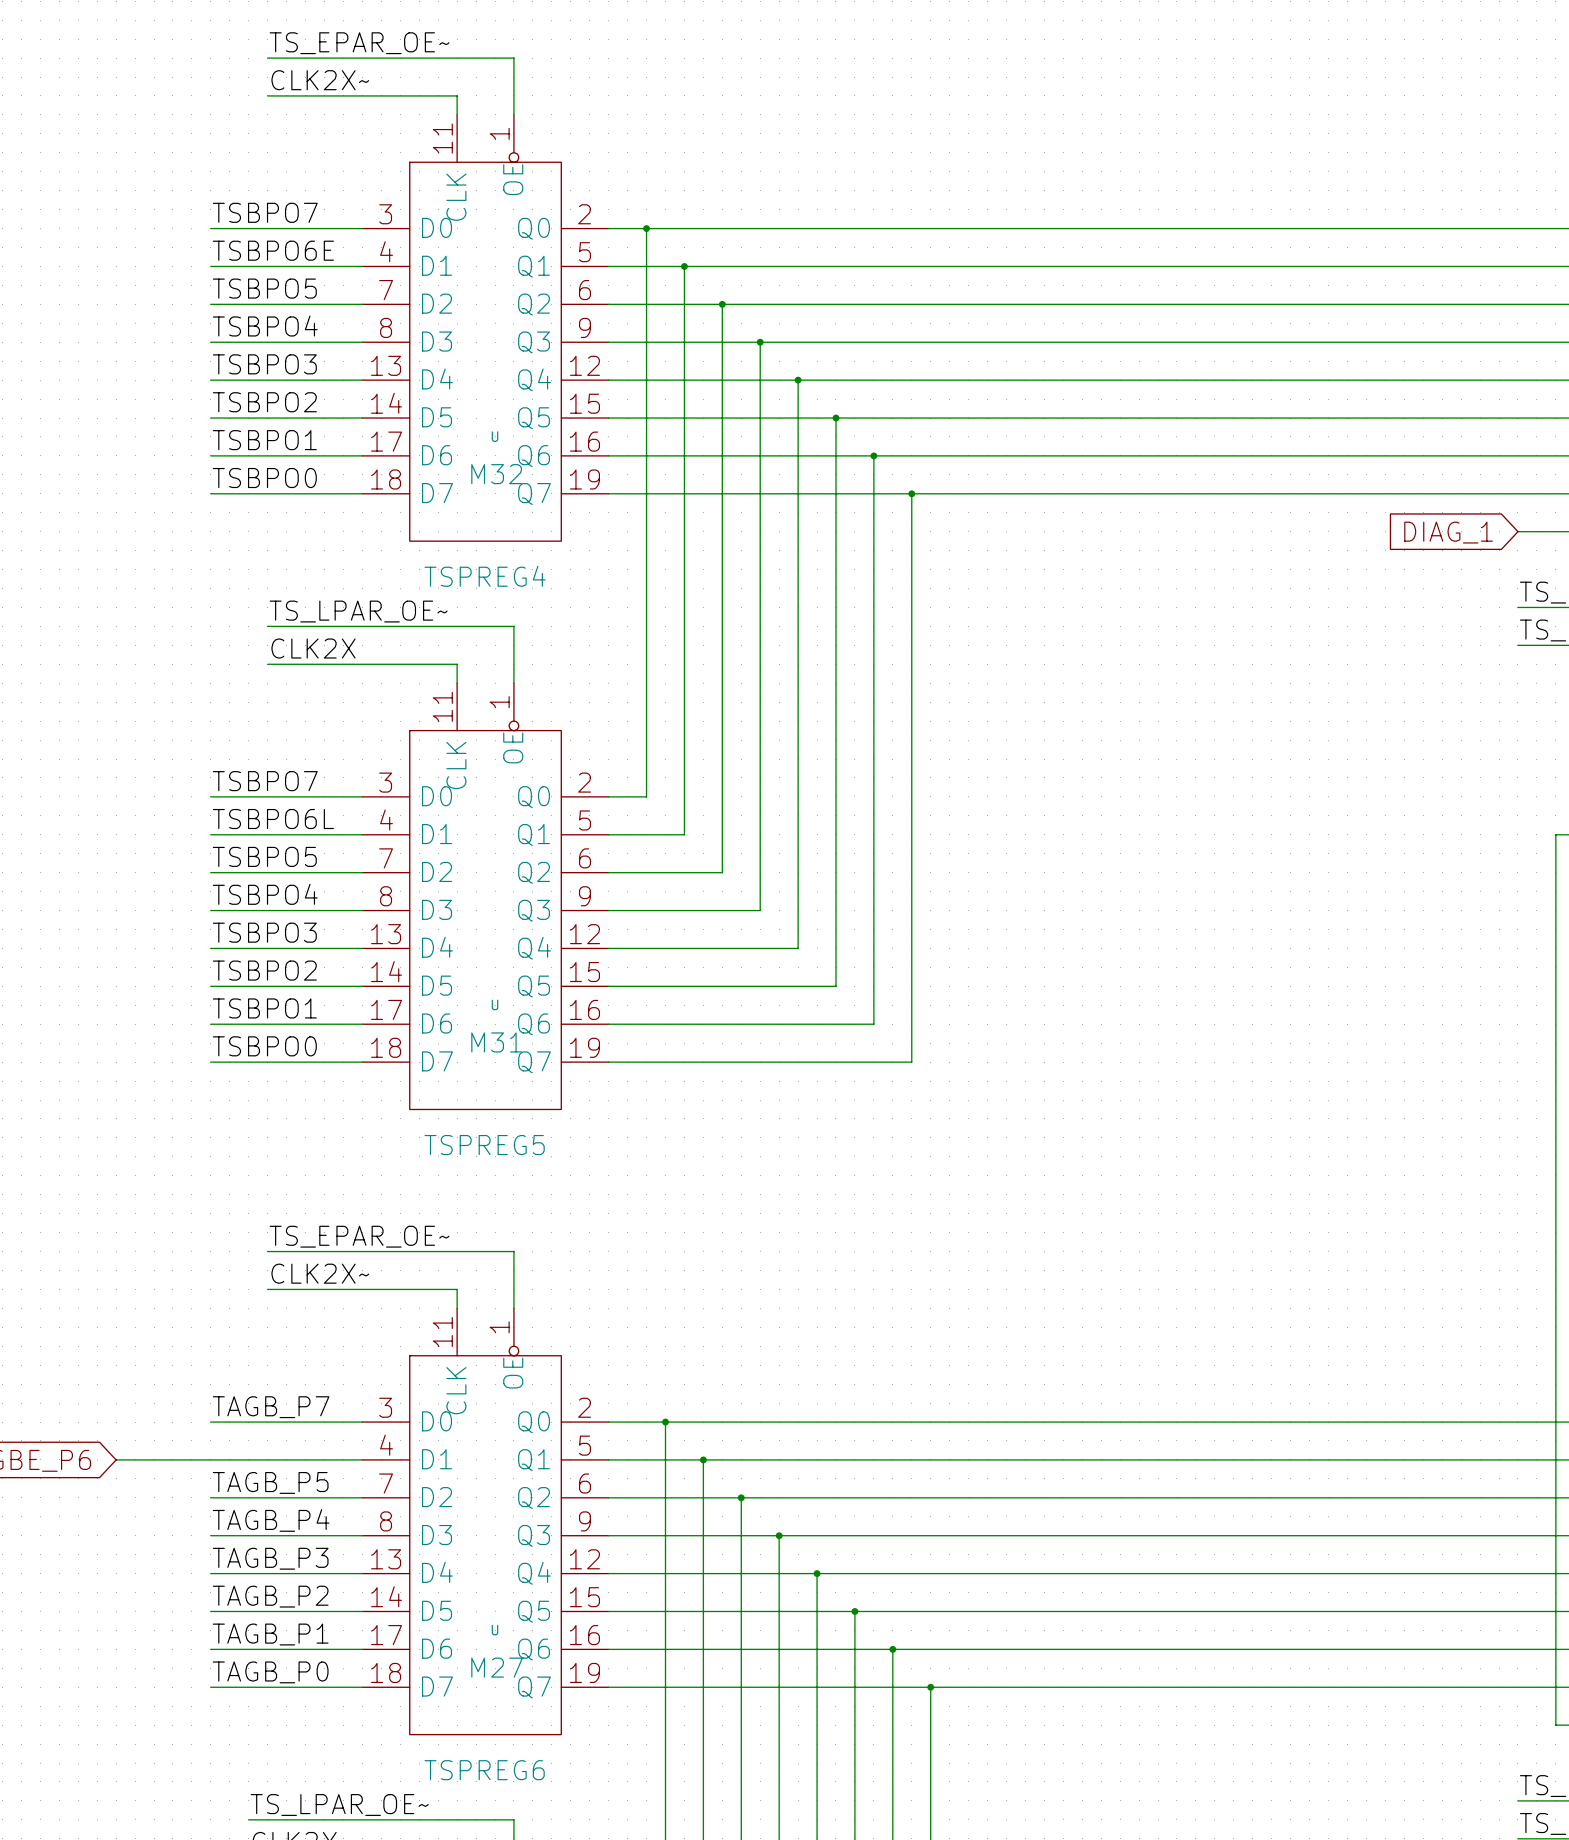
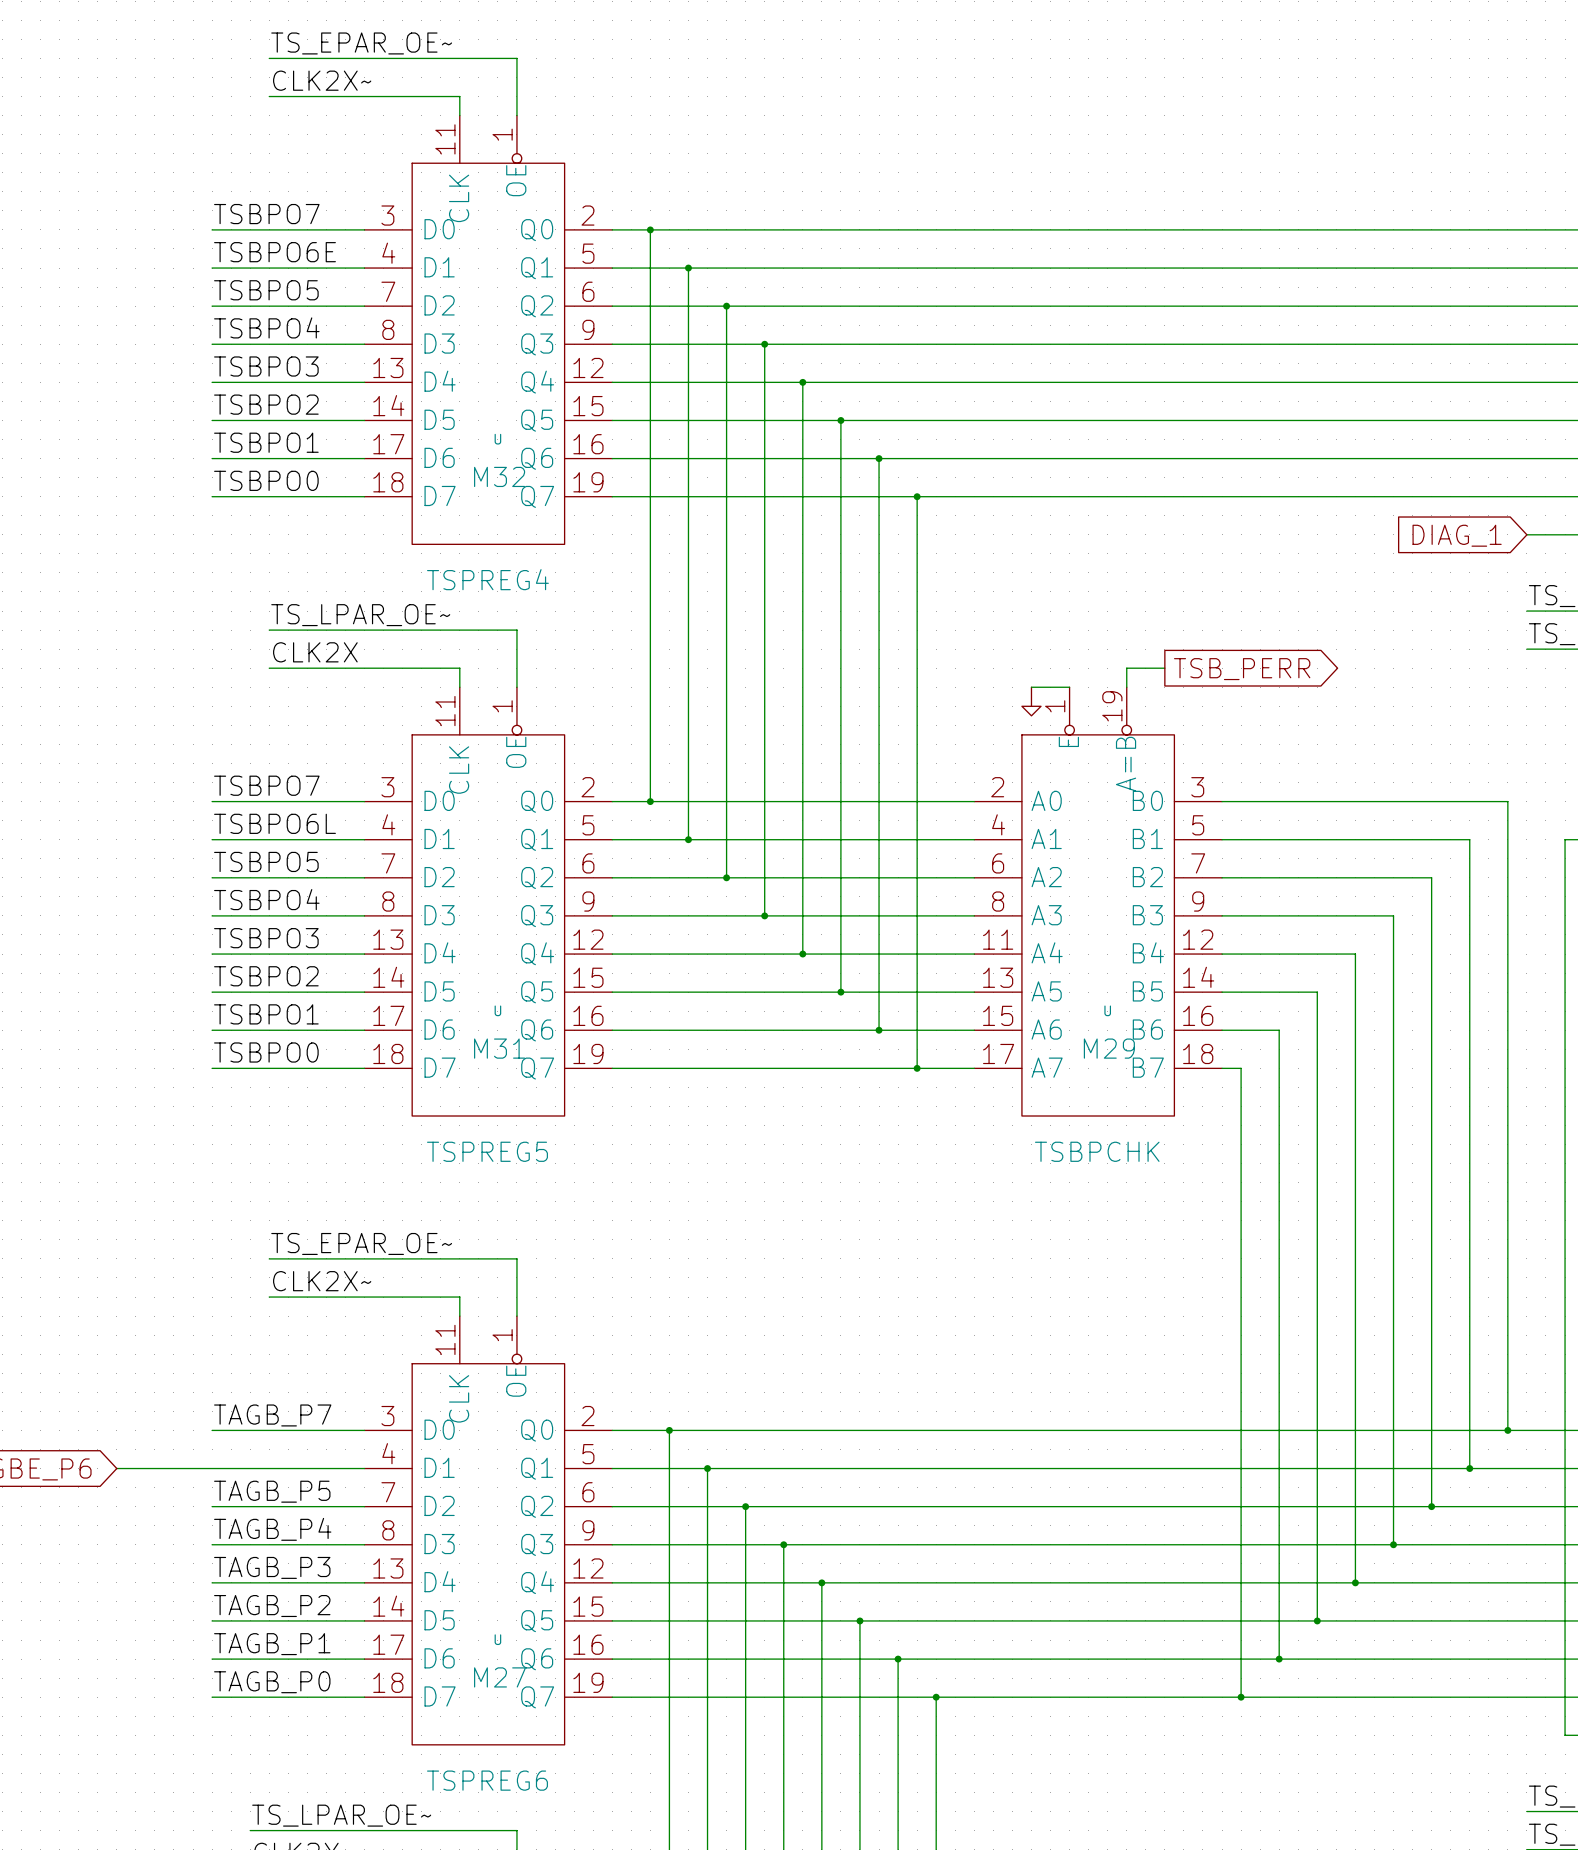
wire: none -> (1164, 668) (1126, 668) (1126, 687)
global label: none -> TSB_PERR (1242, 669)
wire: none -> (1031, 687) (1069, 687)
power symbol: none -> (1031, 701)
wire: none -> (650, 801) (974, 801)
junction: none -> (650, 801)
wire: none -> (1222, 801) (1507, 801) (1507, 1430)
wire: none -> (688, 839) (974, 839)
junction: none -> (688, 839)
wire: none -> (1222, 839) (1469, 839) (1469, 1468)
wire: none -> (726, 877) (974, 877)
junction: none -> (726, 877)
wire: none -> (1222, 877) (1431, 877) (1431, 1506)
U: none -> (1098, 901)
wire: none -> (764, 915) (974, 915)
junction: none -> (764, 915)
wire: none -> (1222, 915) (1393, 915) (1393, 1544)
wire: none -> (802, 954) (974, 954)
junction: none -> (802, 954)
wire: none -> (1222, 954) (1355, 954) (1355, 1582)
wire: none -> (840, 992) (974, 992)
junction: none -> (840, 992)
wire: none -> (1222, 992) (1317, 992) (1317, 1620)
wire: none -> (879, 1030) (974, 1030)
junction: none -> (879, 1030)
wire: none -> (1222, 1030) (1279, 1030) (1279, 1659)
wire: none -> (917, 1068) (974, 1068)
junction: none -> (917, 1068)
wire: none -> (1222, 1068) (1241, 1068) (1241, 1697)
junction: none -> (1507, 1430)
junction: none -> (1469, 1468)
junction: none -> (1431, 1506)
junction: none -> (1393, 1544)
junction: none -> (1355, 1582)
junction: none -> (1317, 1620)
junction: none -> (1279, 1659)
junction: none -> (1241, 1697)

